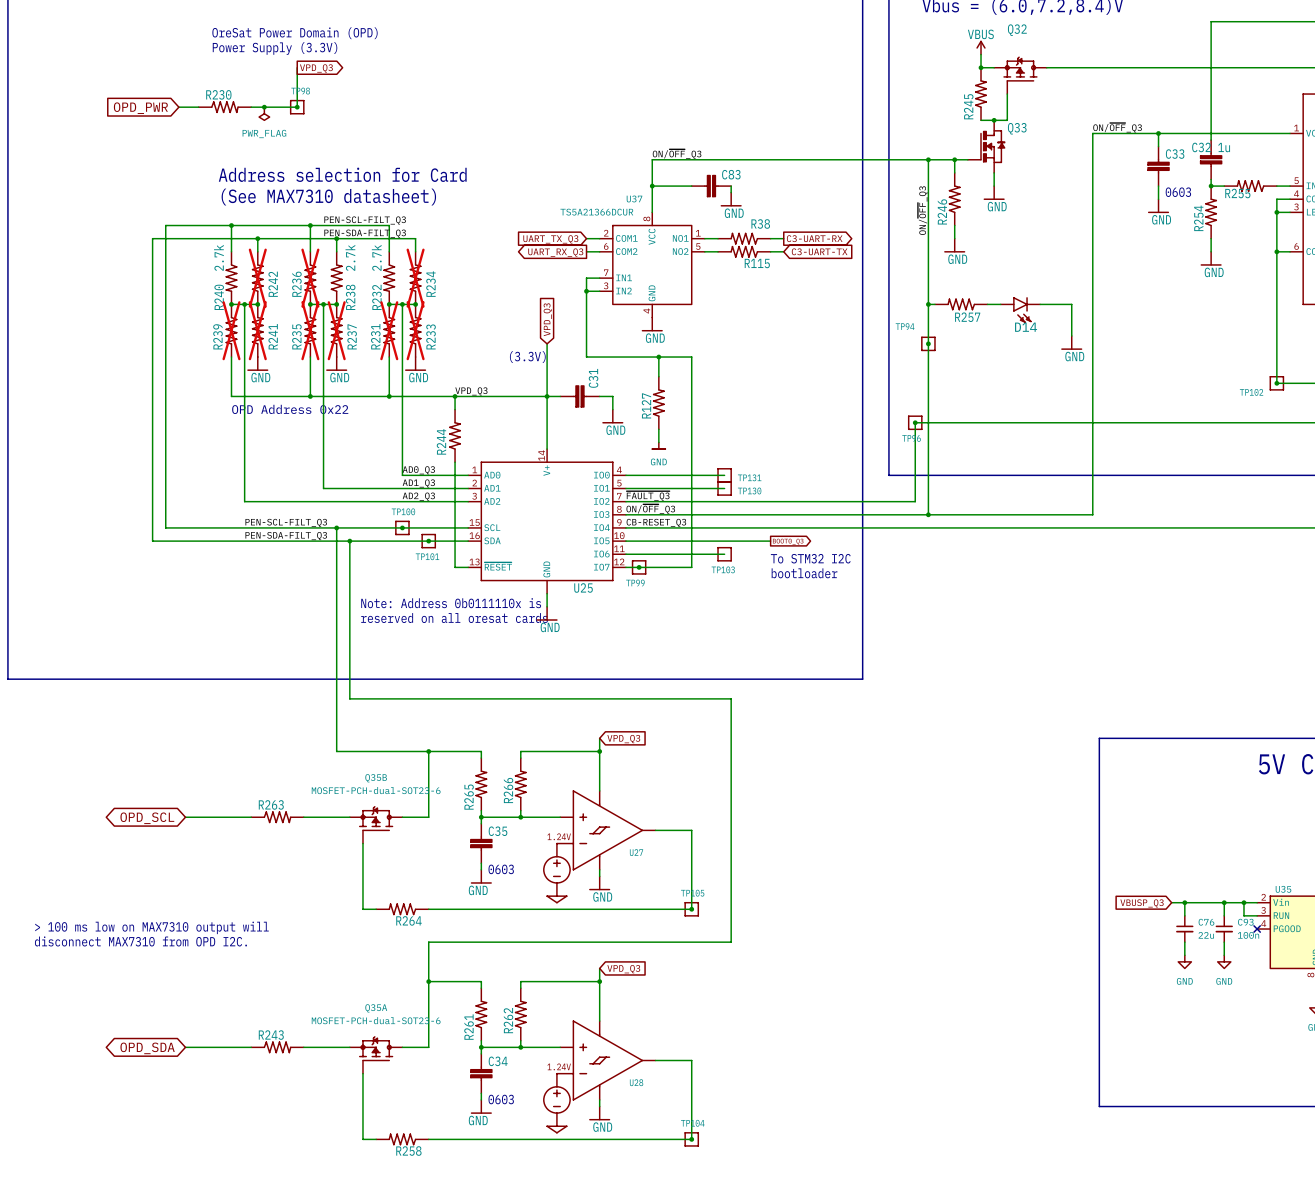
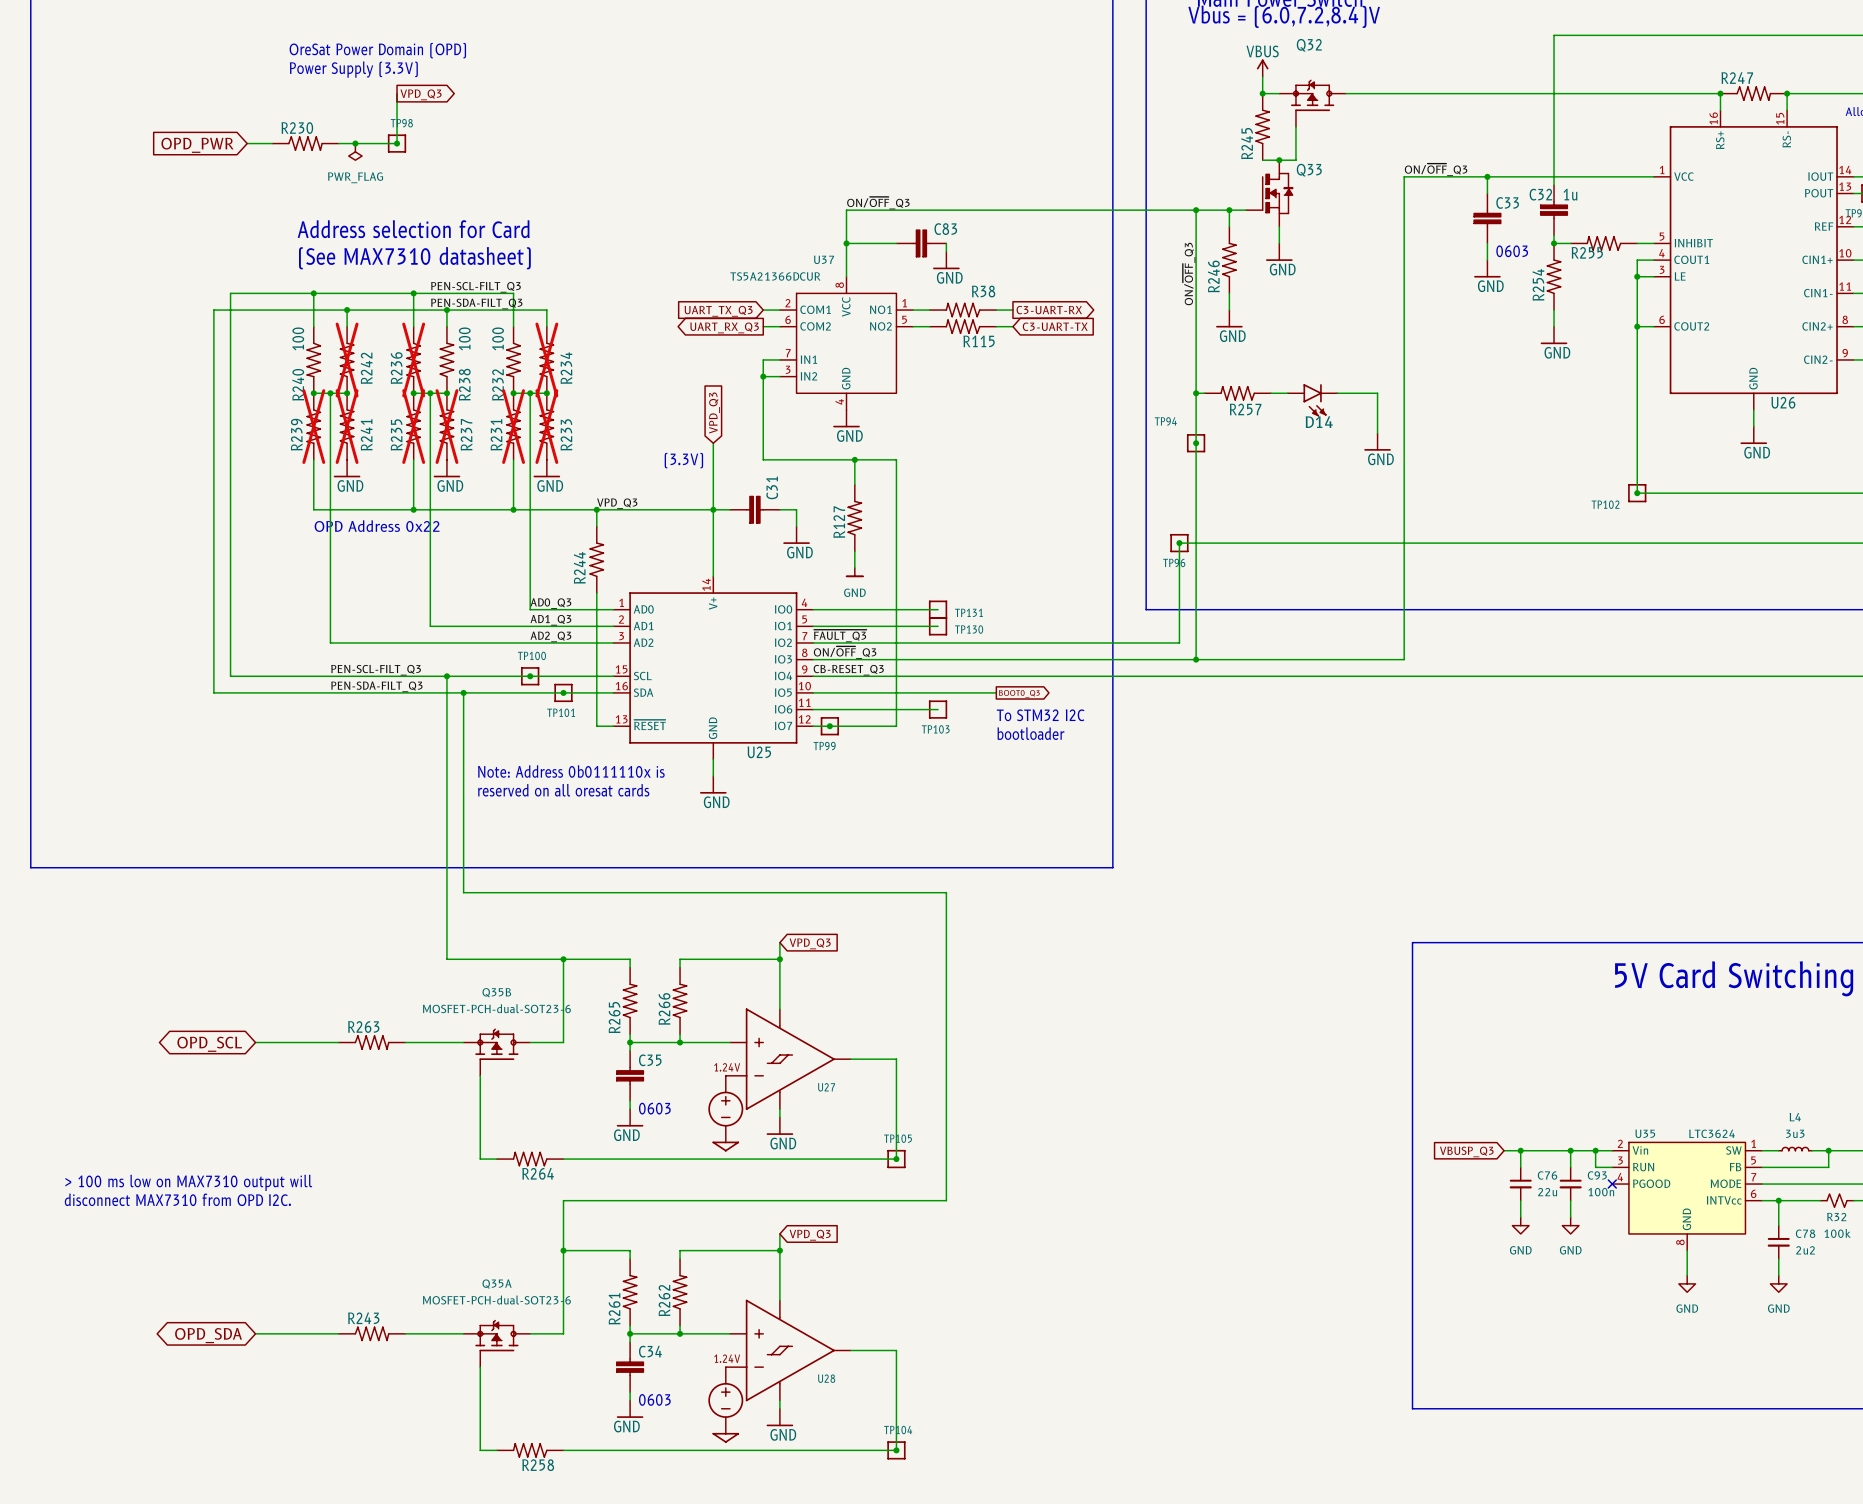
R240 value: 2.7k (218, 257) -> 100 (298, 338)
R238 value: 2.7k (350, 257) -> 100 (464, 338)
R232 value: 2.7k (376, 257) -> 100 (498, 338)

